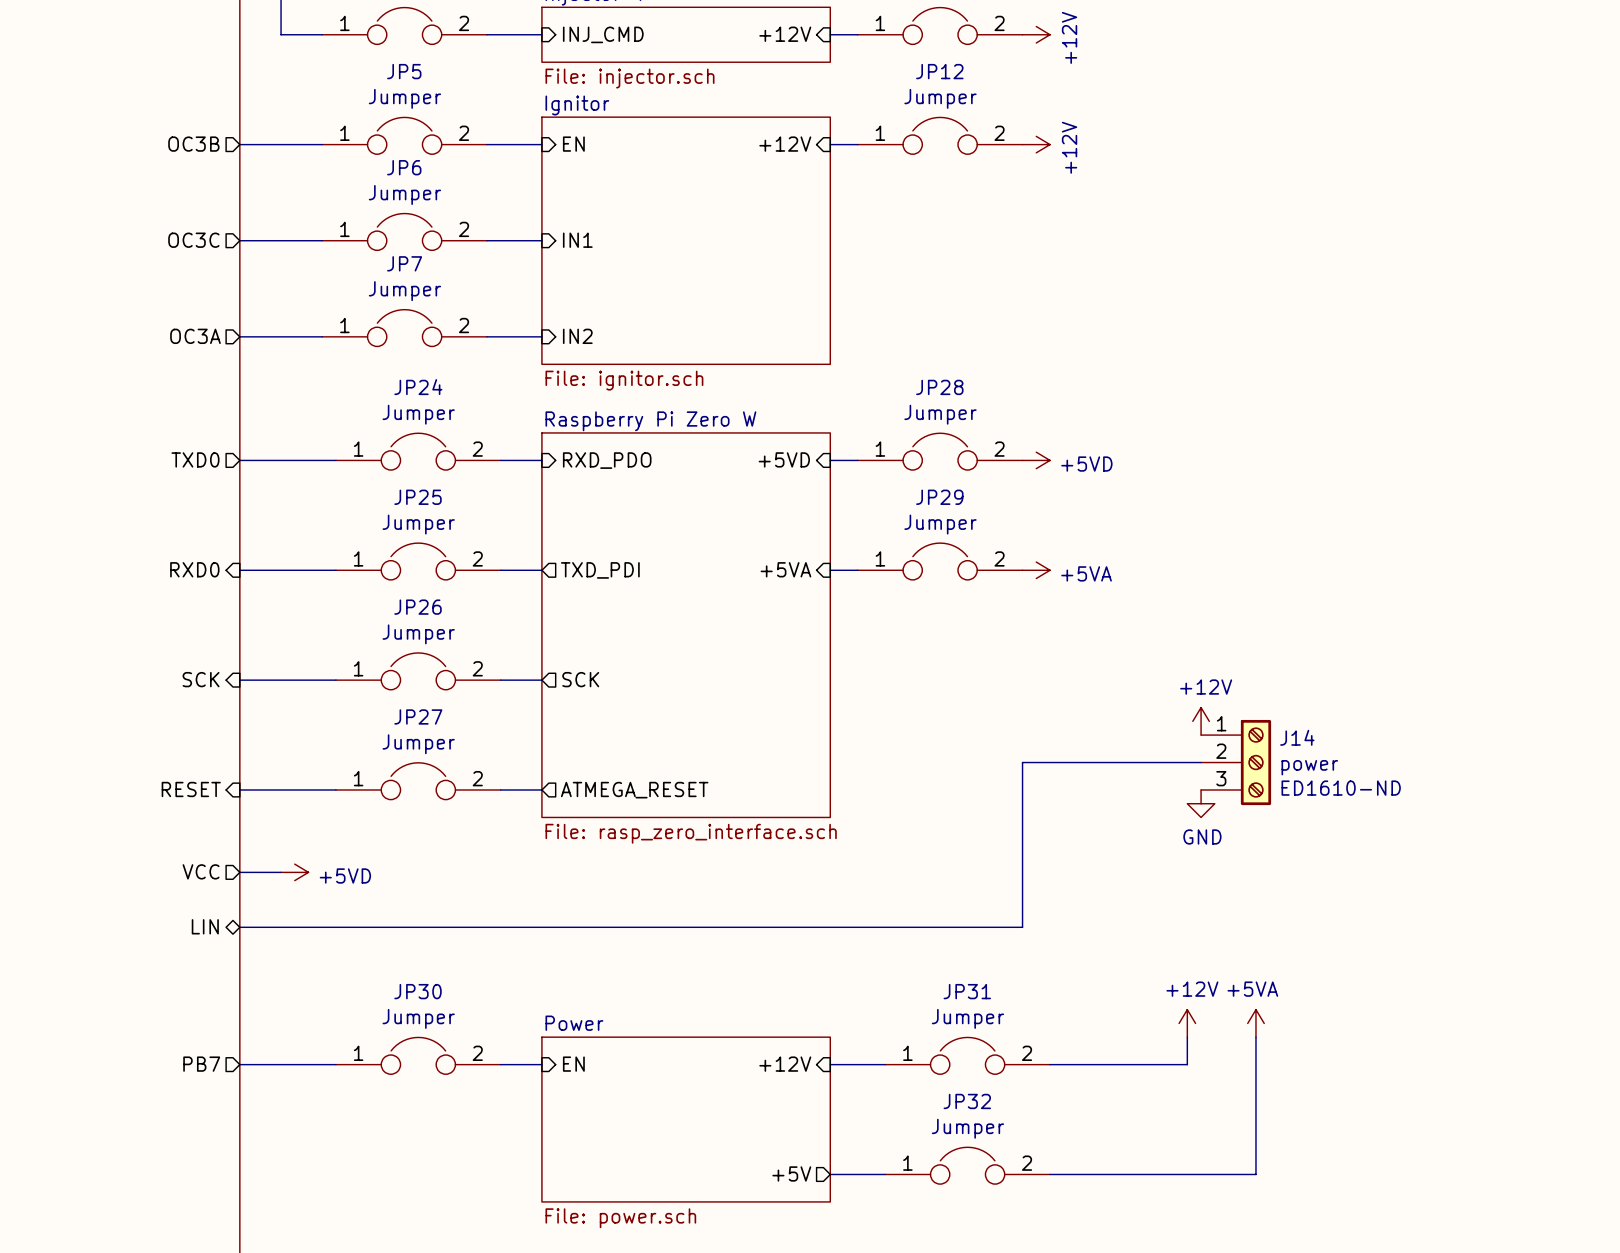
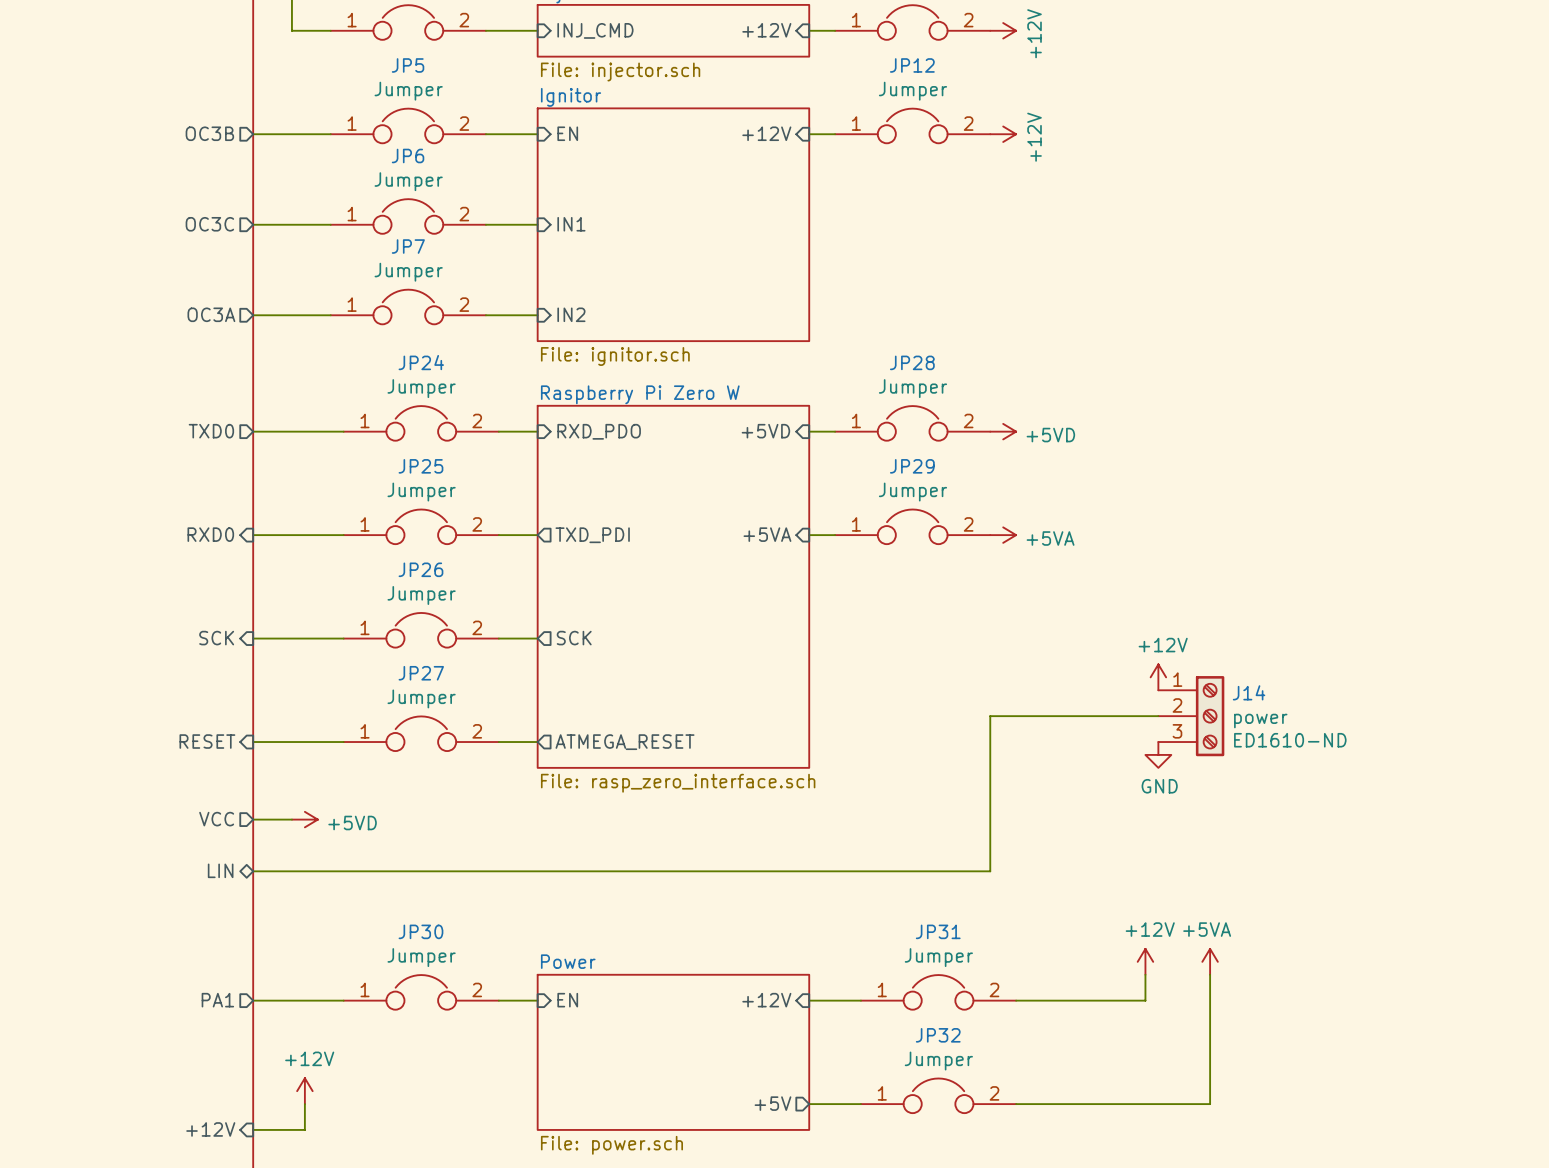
sheet pin: PB7 (201, 1064) -> PA1 (217, 1000)
power symbol: none -> +12V (304, 1091)
wire: none -> (304, 1104) (304, 1129) (253, 1129)
sheet pin: none -> +12V (210, 1129)

